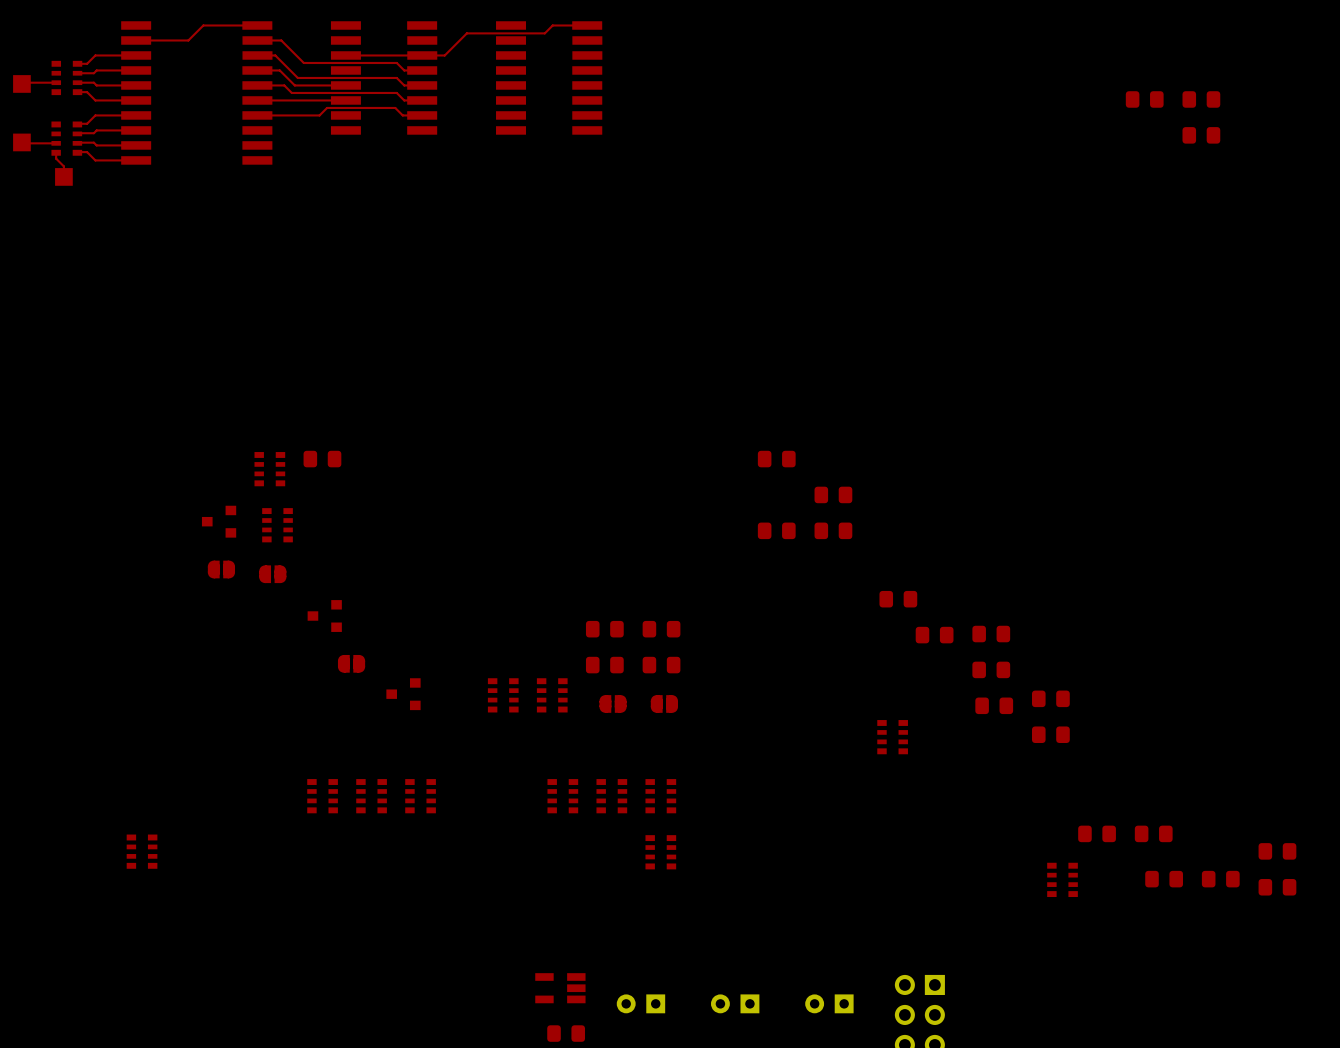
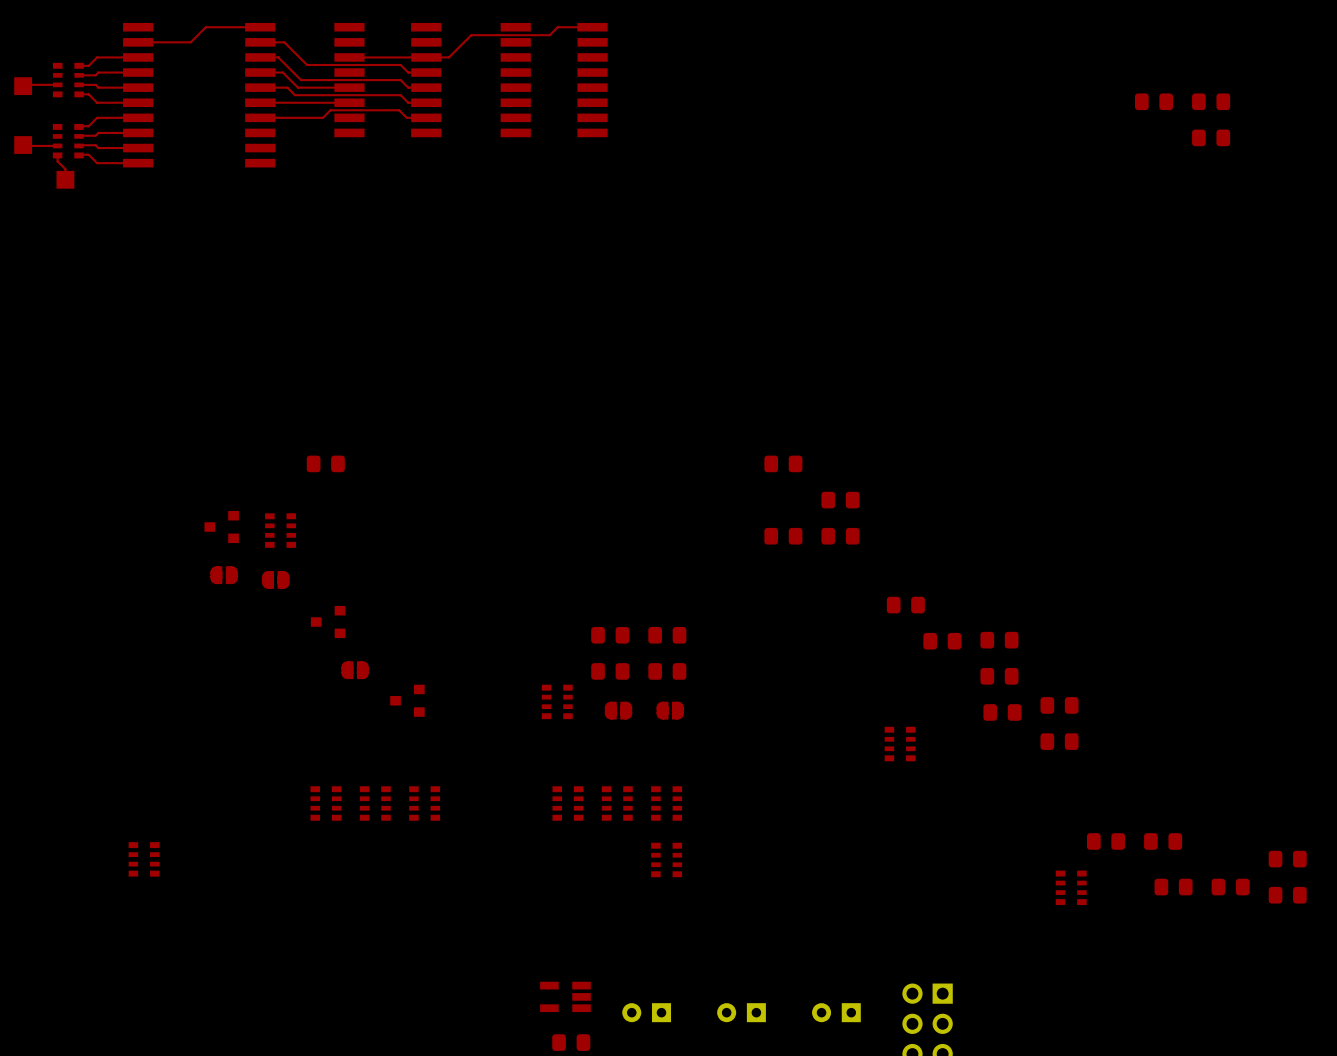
part: (269, 469) -> none
part: (503, 695) -> none

